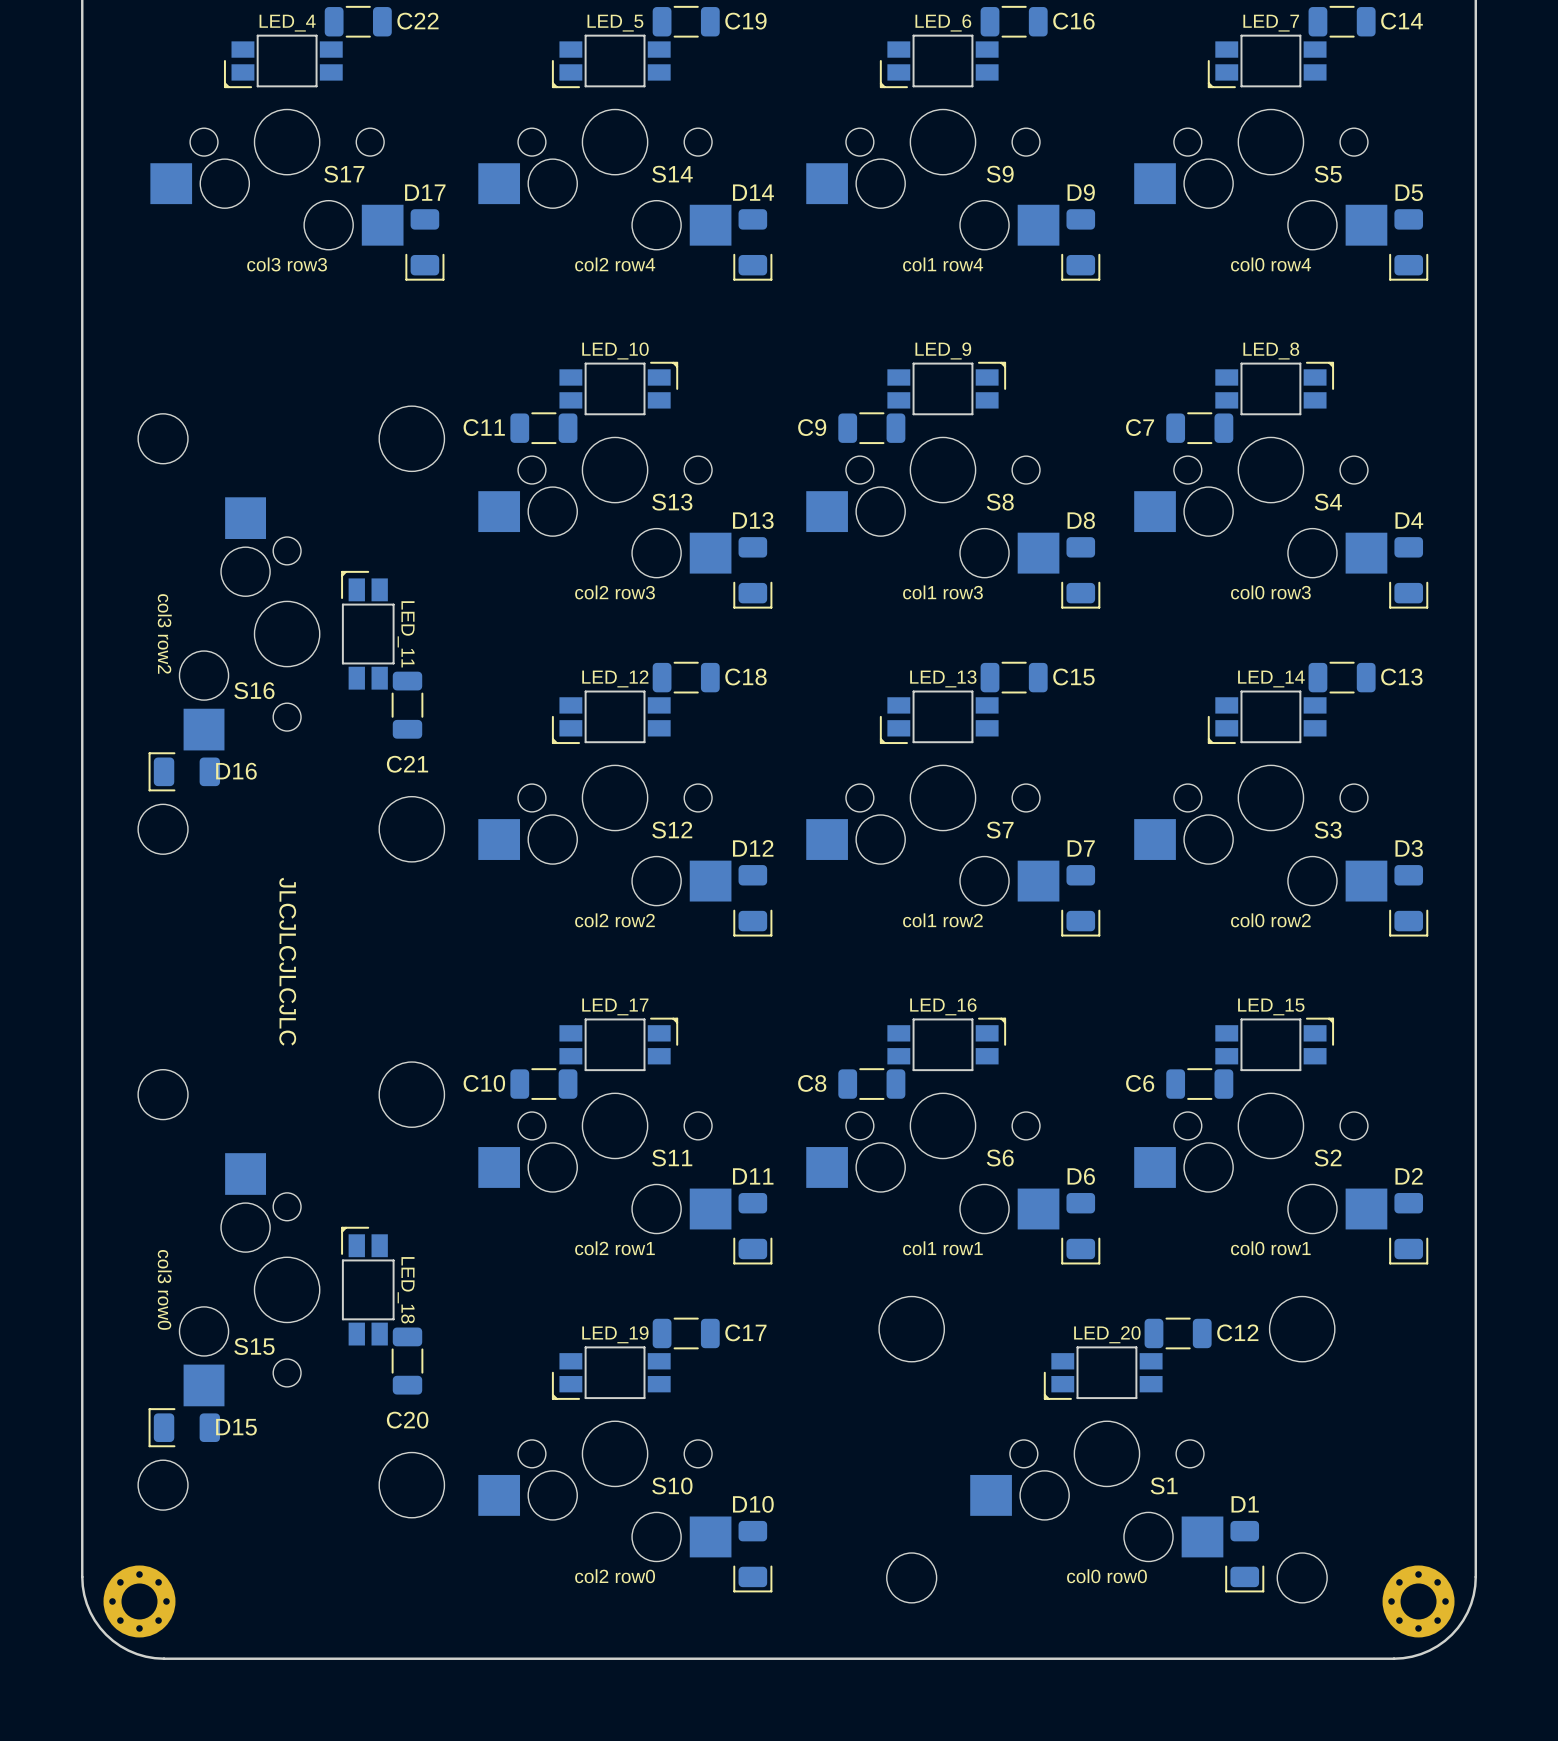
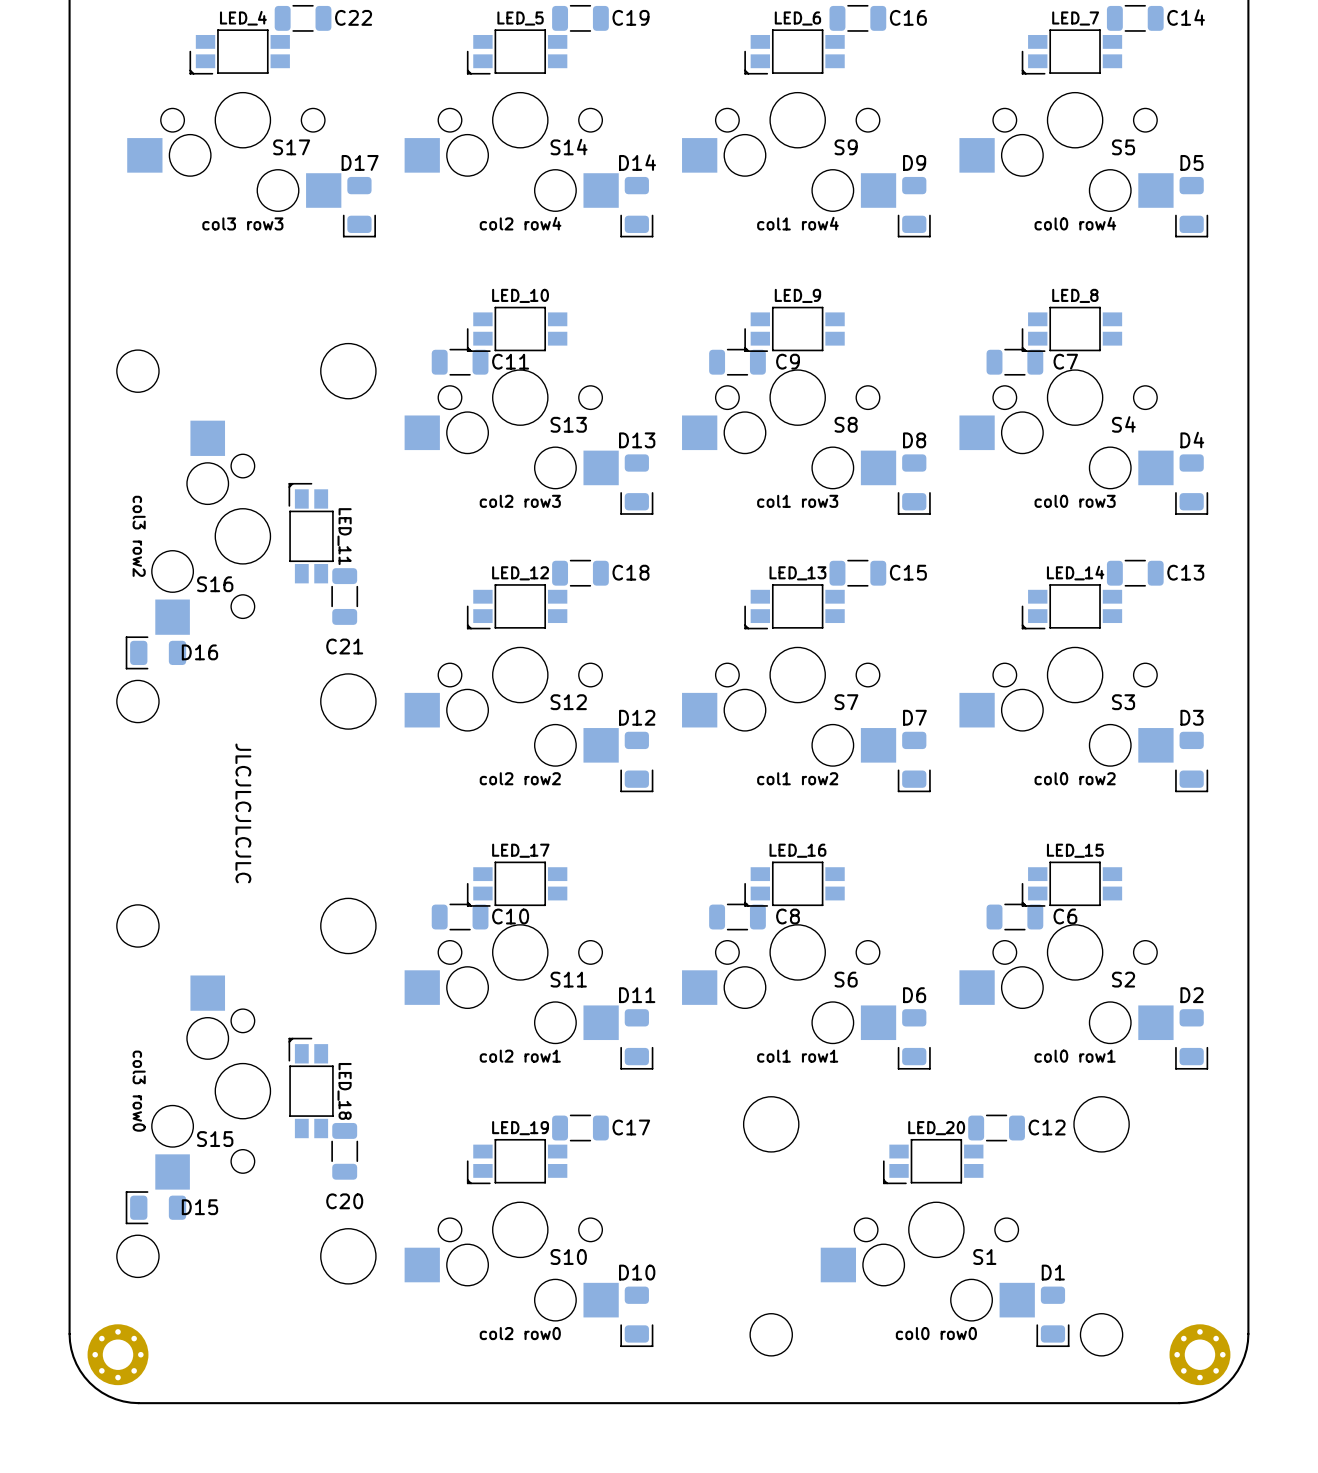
part rotation: 0° (618, 388) -> 180° (517, 329)
part rotation: 0° (946, 388) -> 180° (794, 329)
part rotation: 0° (1274, 388) -> 180° (1071, 329)
C11 name position: C11 (484, 427) -> C11 (510, 361)
C9 name position: C9 (812, 427) -> C9 (788, 361)
C7 name position: C7 (1140, 427) -> C7 (1065, 361)
part rotation: 0° (618, 1044) -> 180° (517, 884)
part rotation: 0° (946, 1044) -> 180° (794, 884)
part rotation: 0° (1274, 1044) -> 180° (1071, 884)
C10 name position: C10 (484, 1083) -> C10 (510, 916)
C8 name position: C8 (812, 1083) -> C8 (788, 916)
C6 name position: C6 (1140, 1083) -> C6 (1065, 916)

